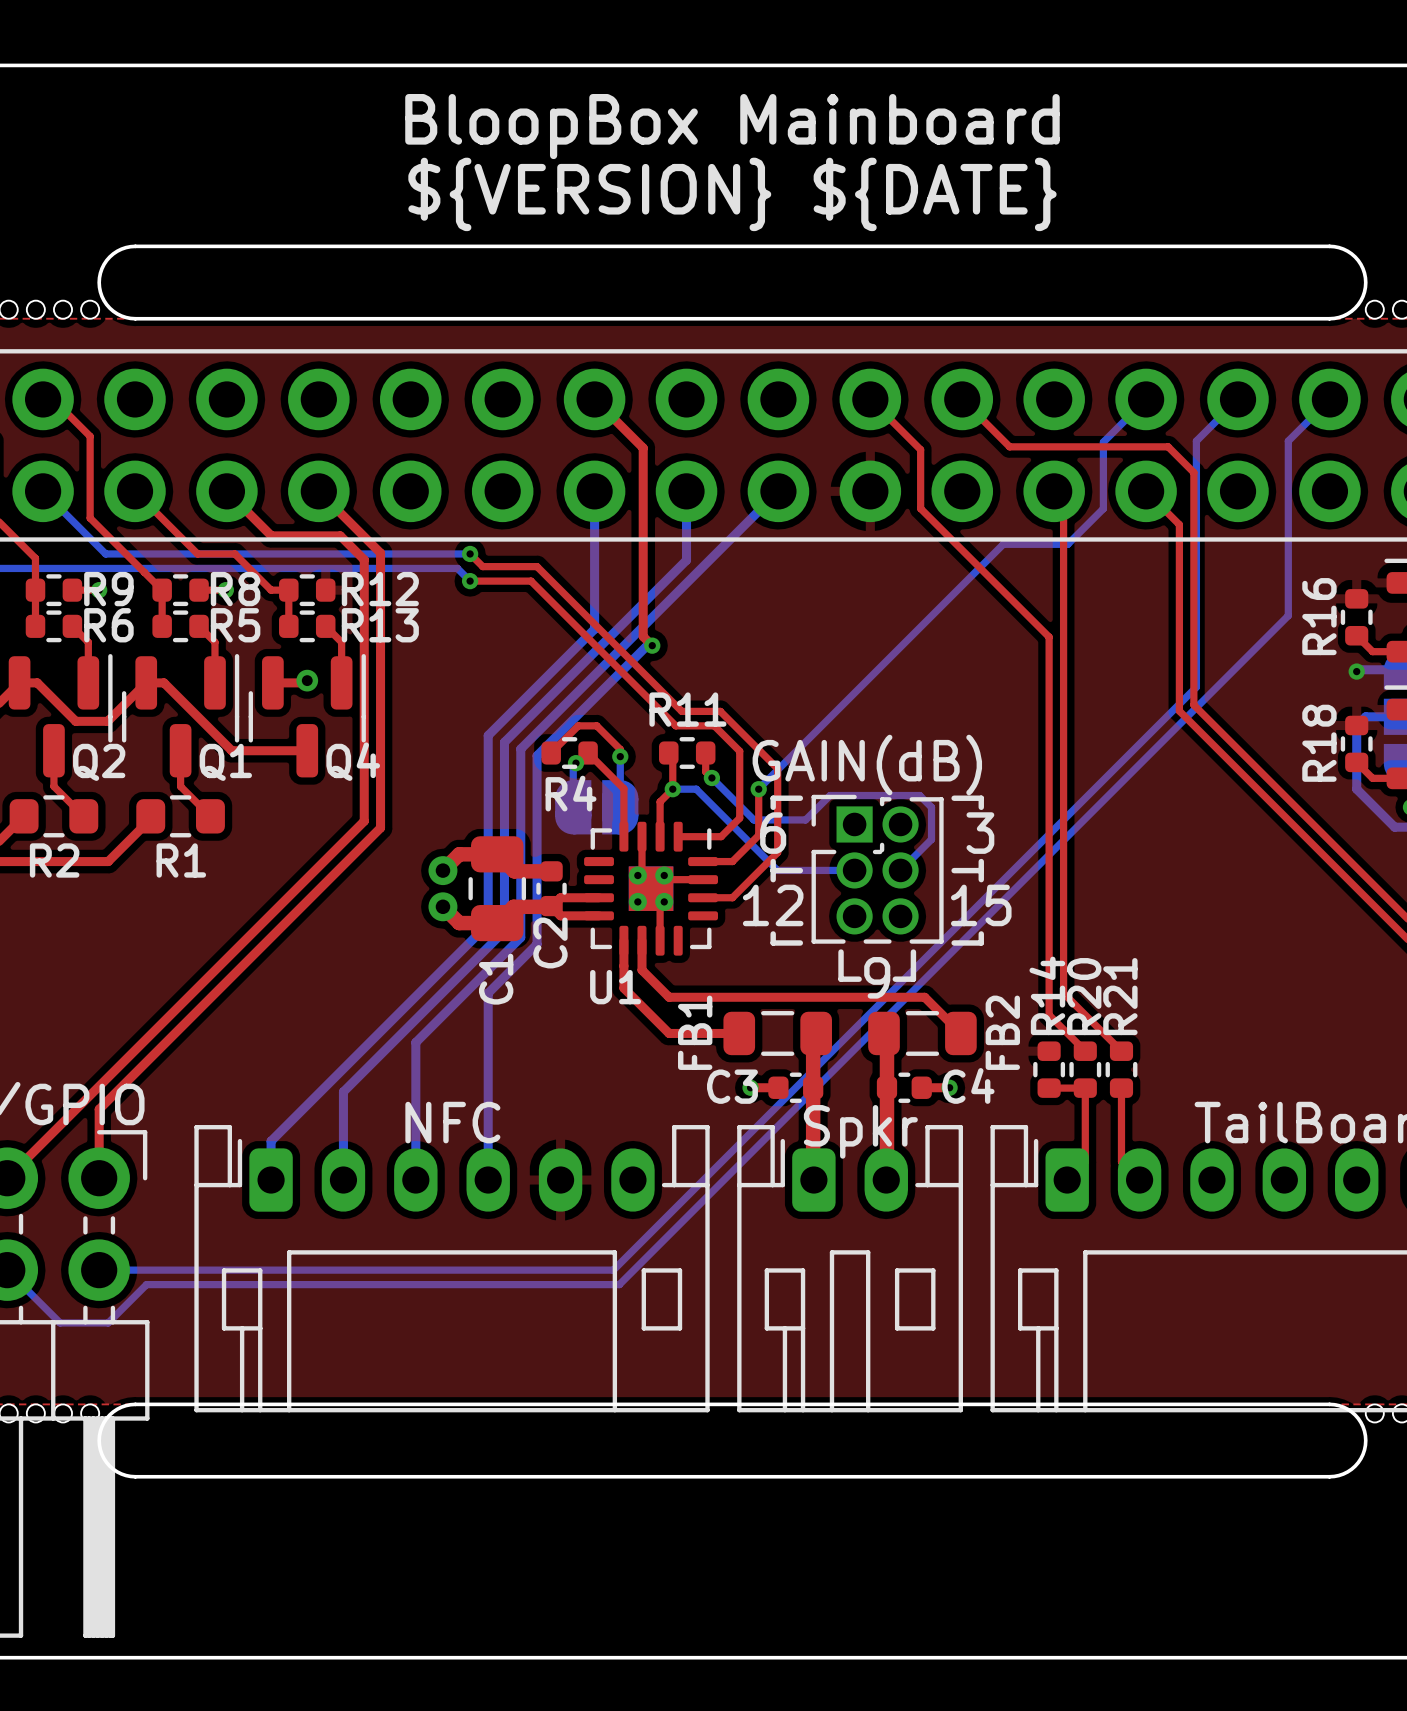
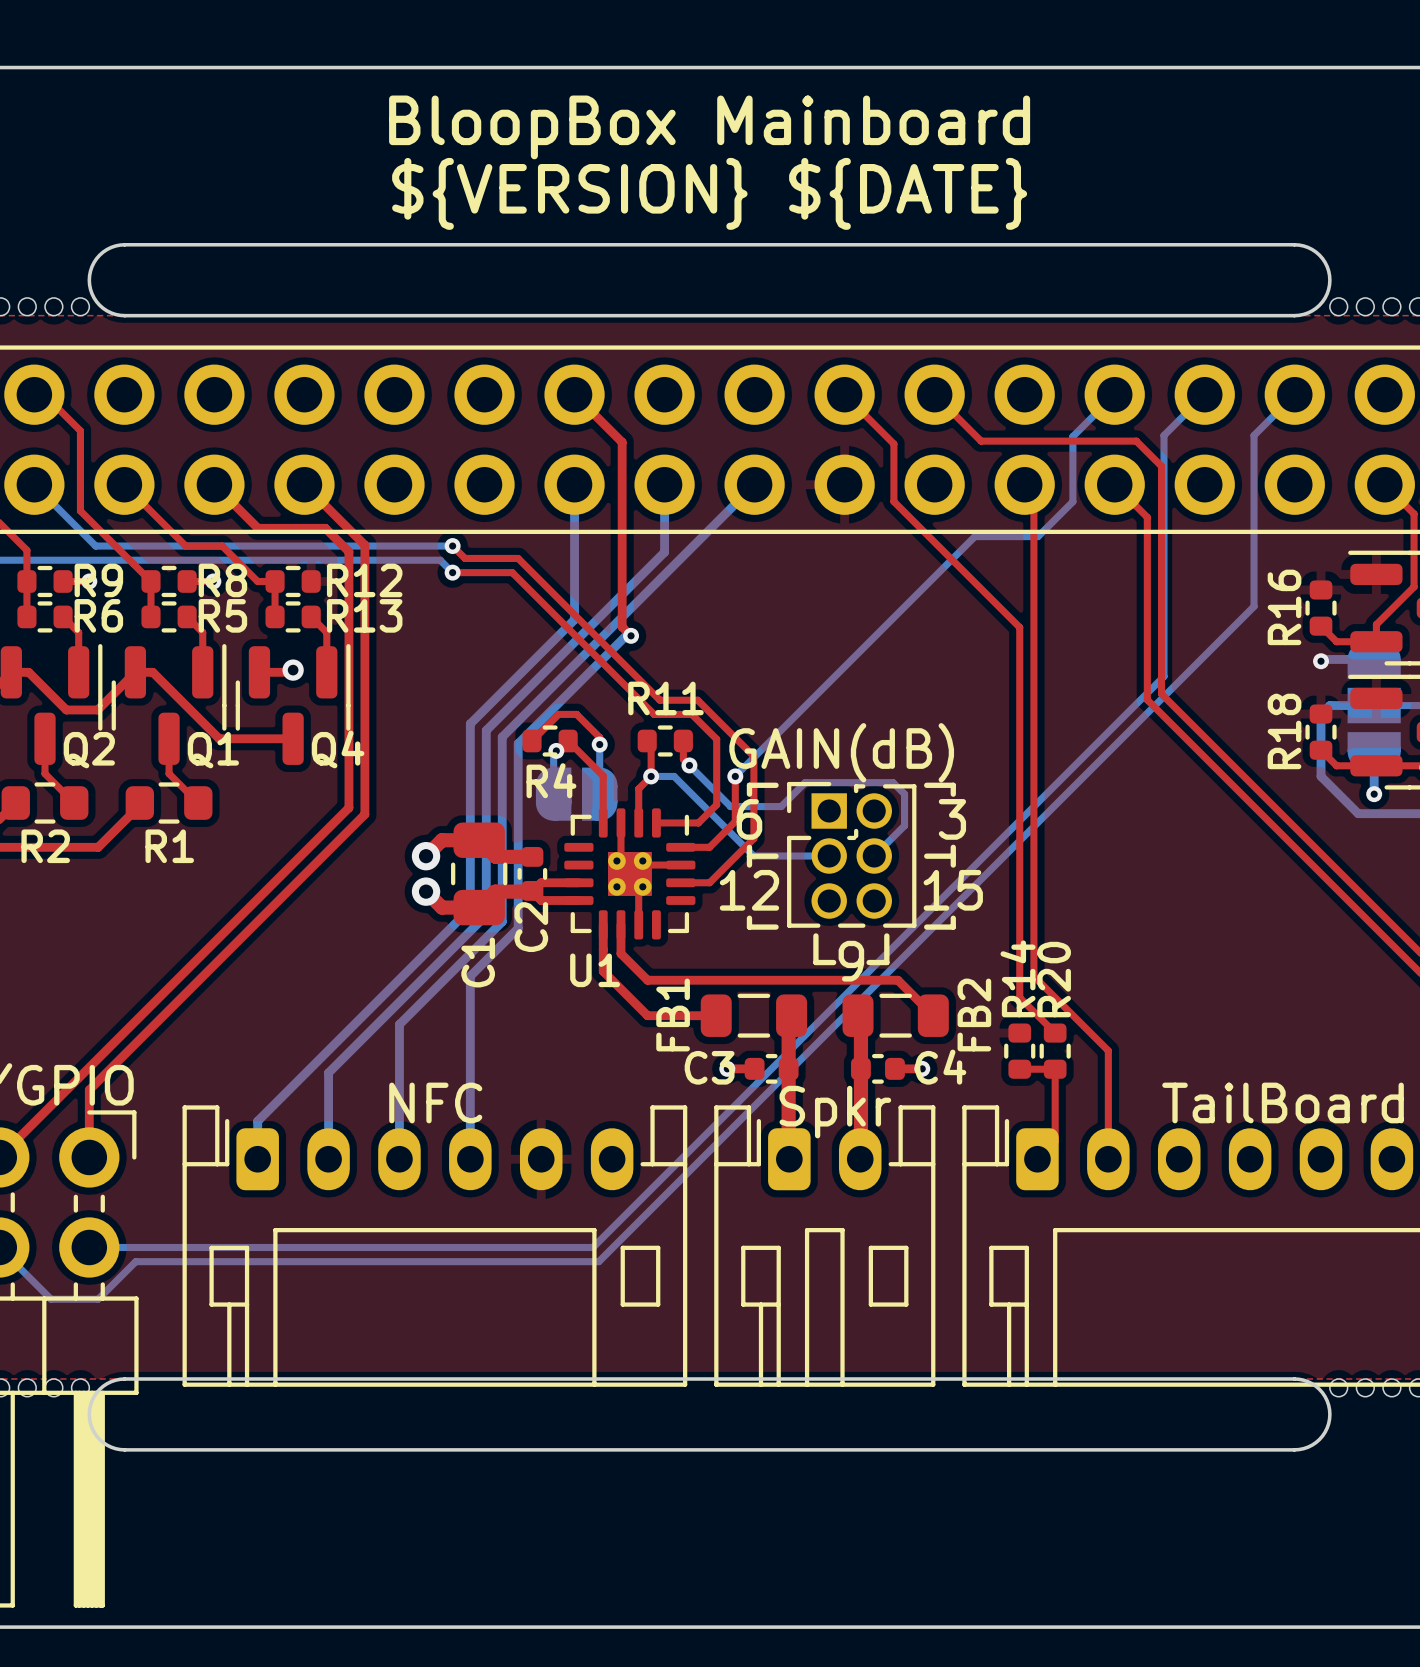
R21: (1121, 1069) -> none
top track: (1121, 1088) (1121, 1161) (1139, 1180) -> (1090, 1033) (1108, 1050) (1108, 1159)

